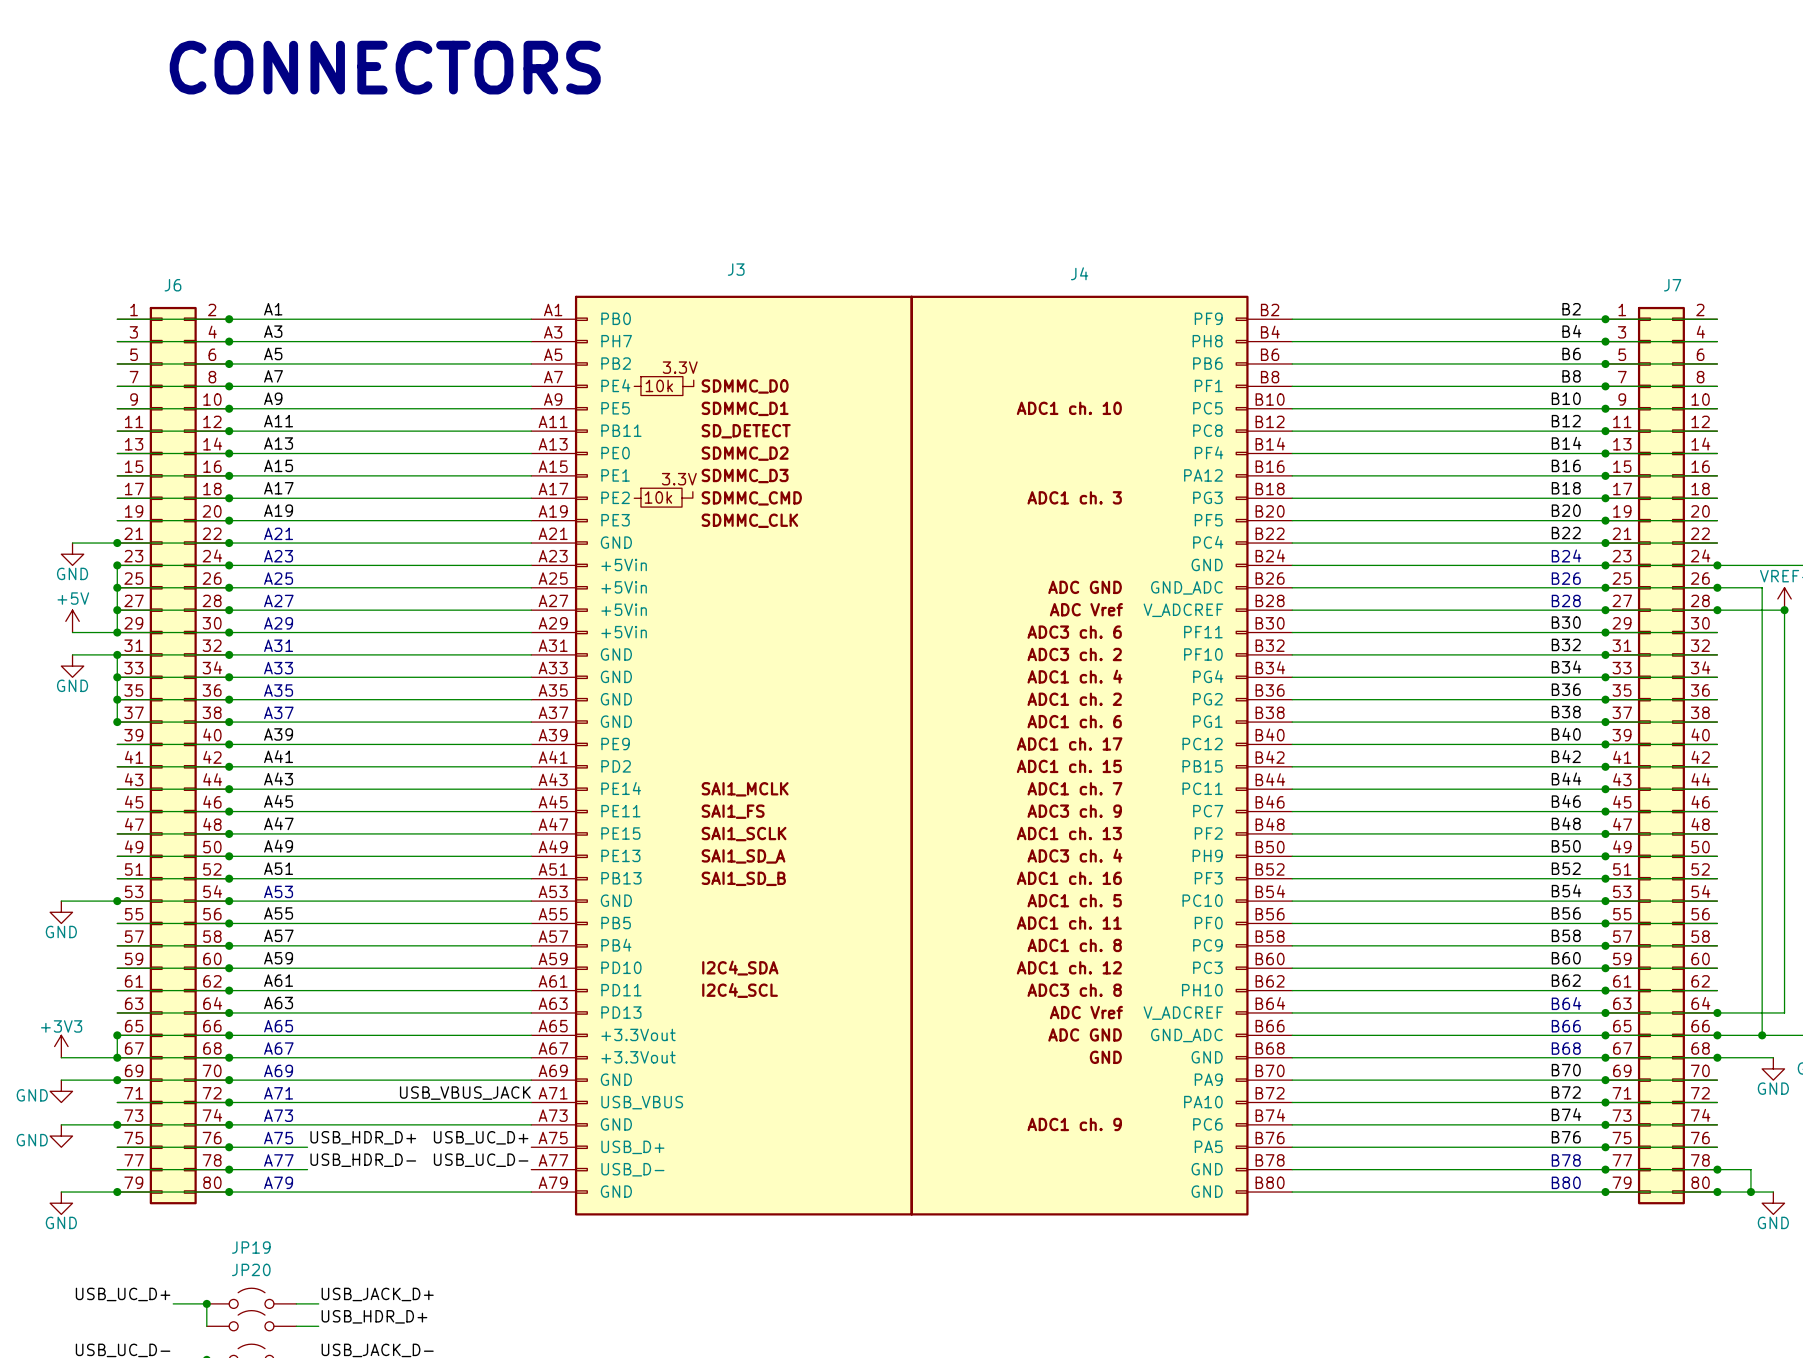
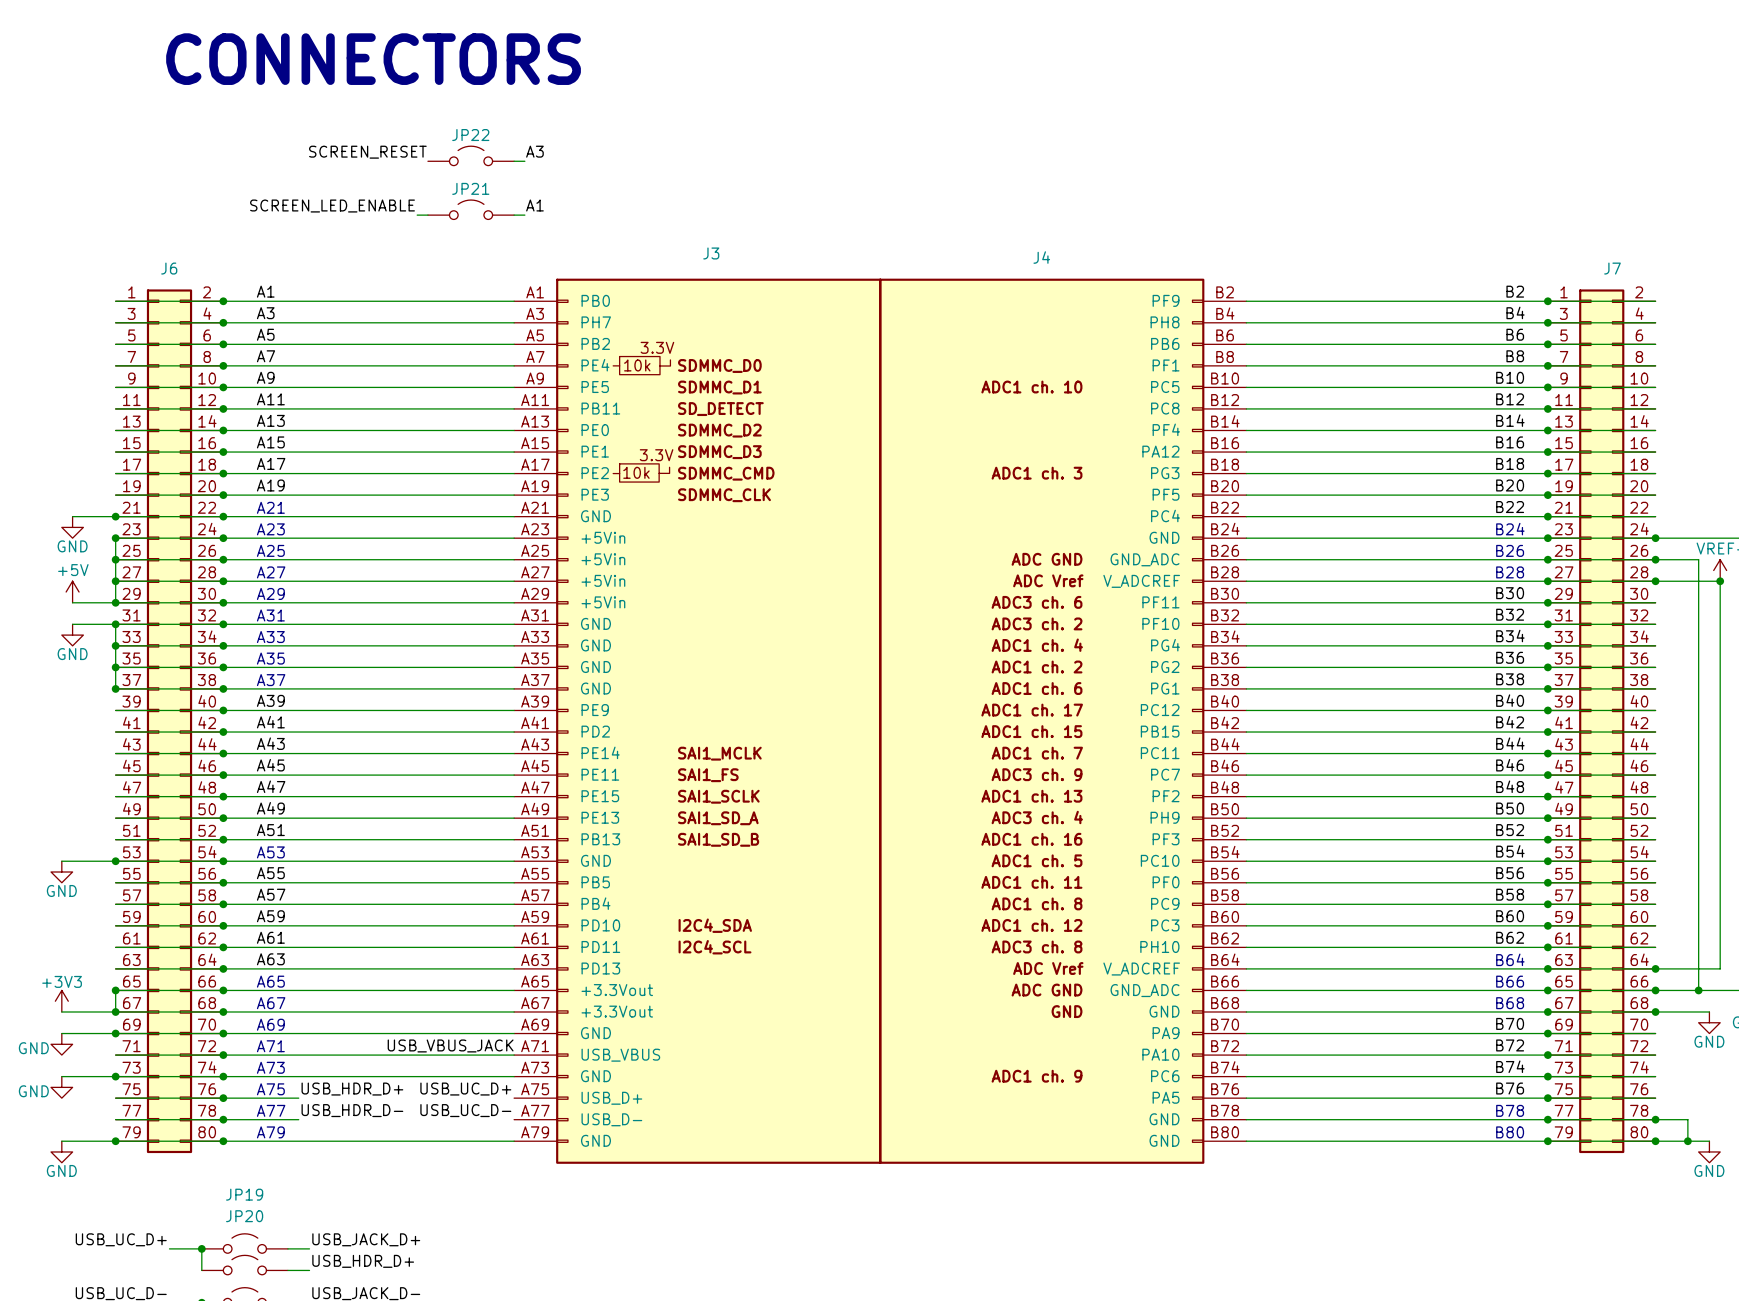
label: none -> A3 (534, 151)
label: none -> SCREEN_RESET (367, 152)
JP22: none -> (471, 155)
wire: none -> (514, 161) (524, 161)
label: none -> A1 (534, 205)
label: none -> SCREEN_LED_ENABLE (332, 206)
JP21: none -> (471, 209)
wire: none -> (417, 215) (427, 215)
wire: none -> (514, 215) (524, 215)

